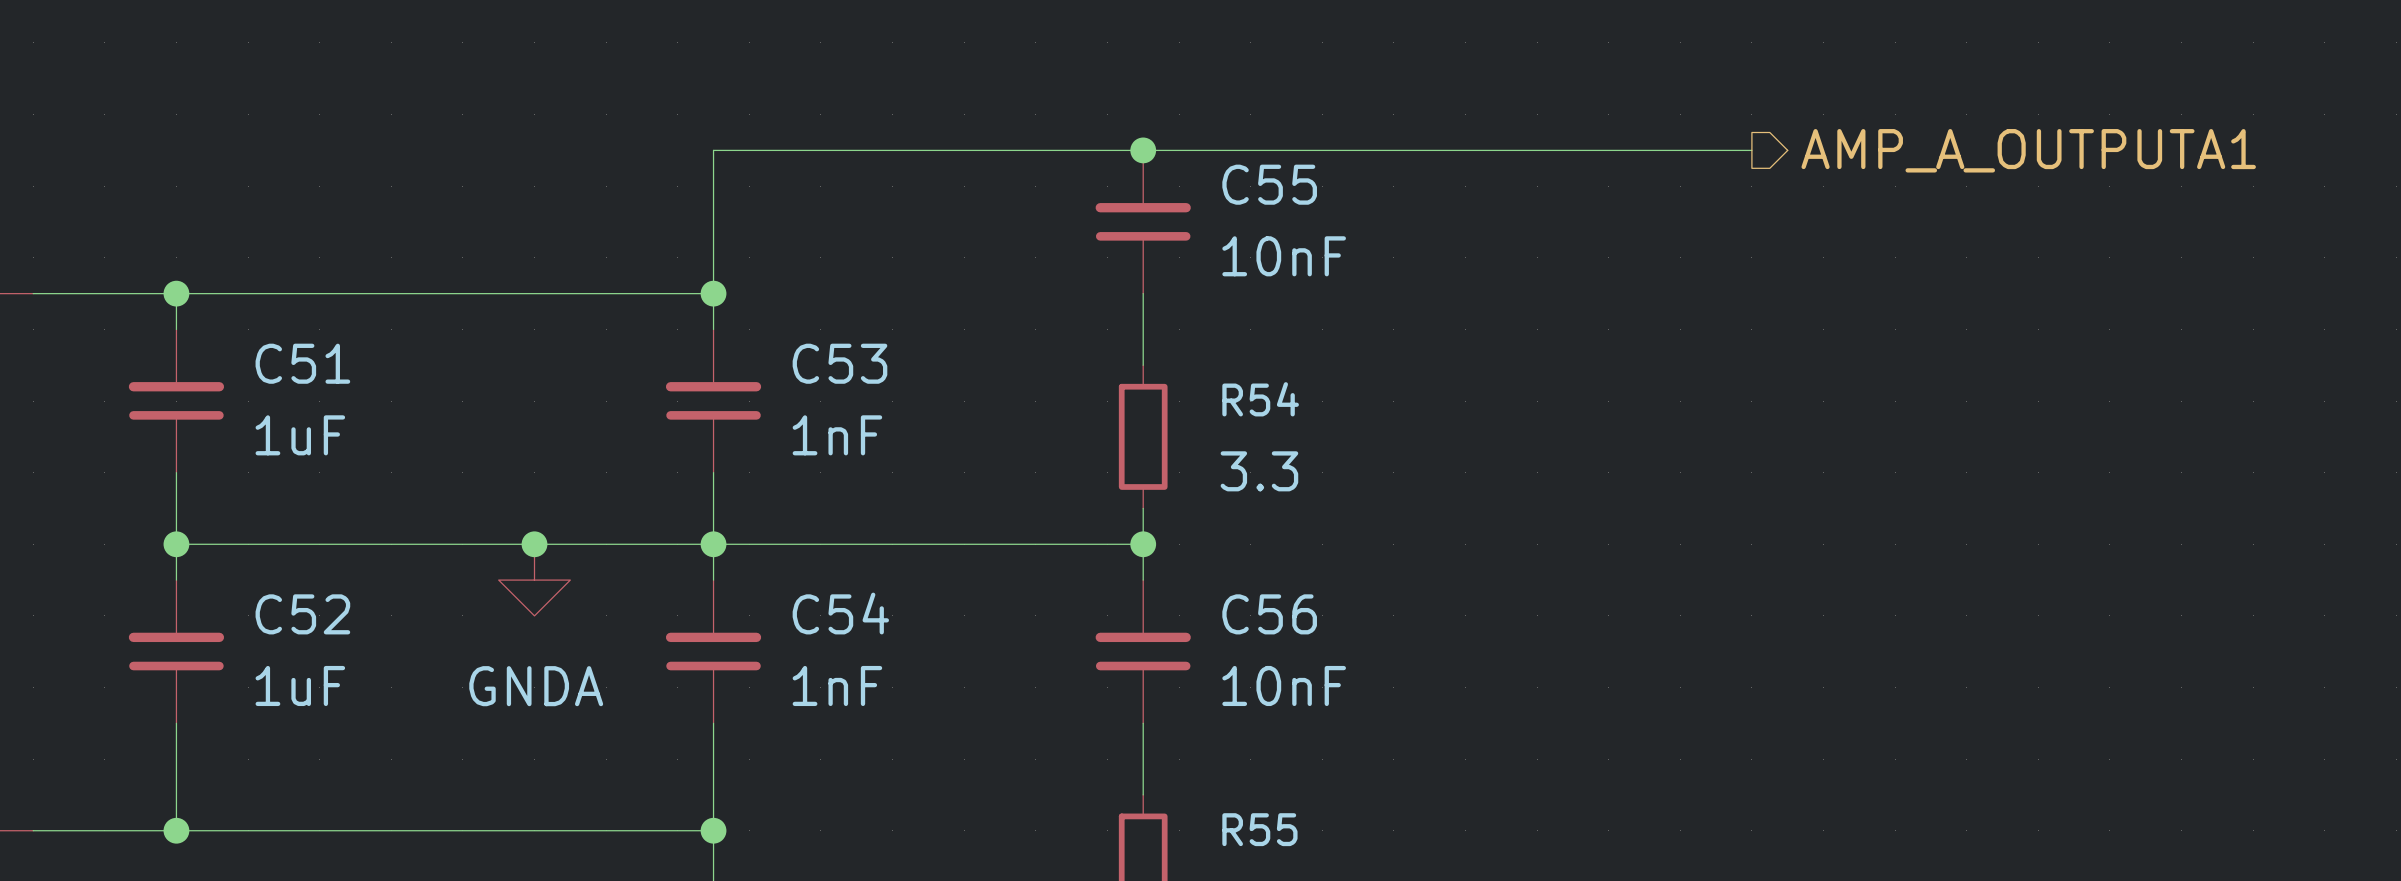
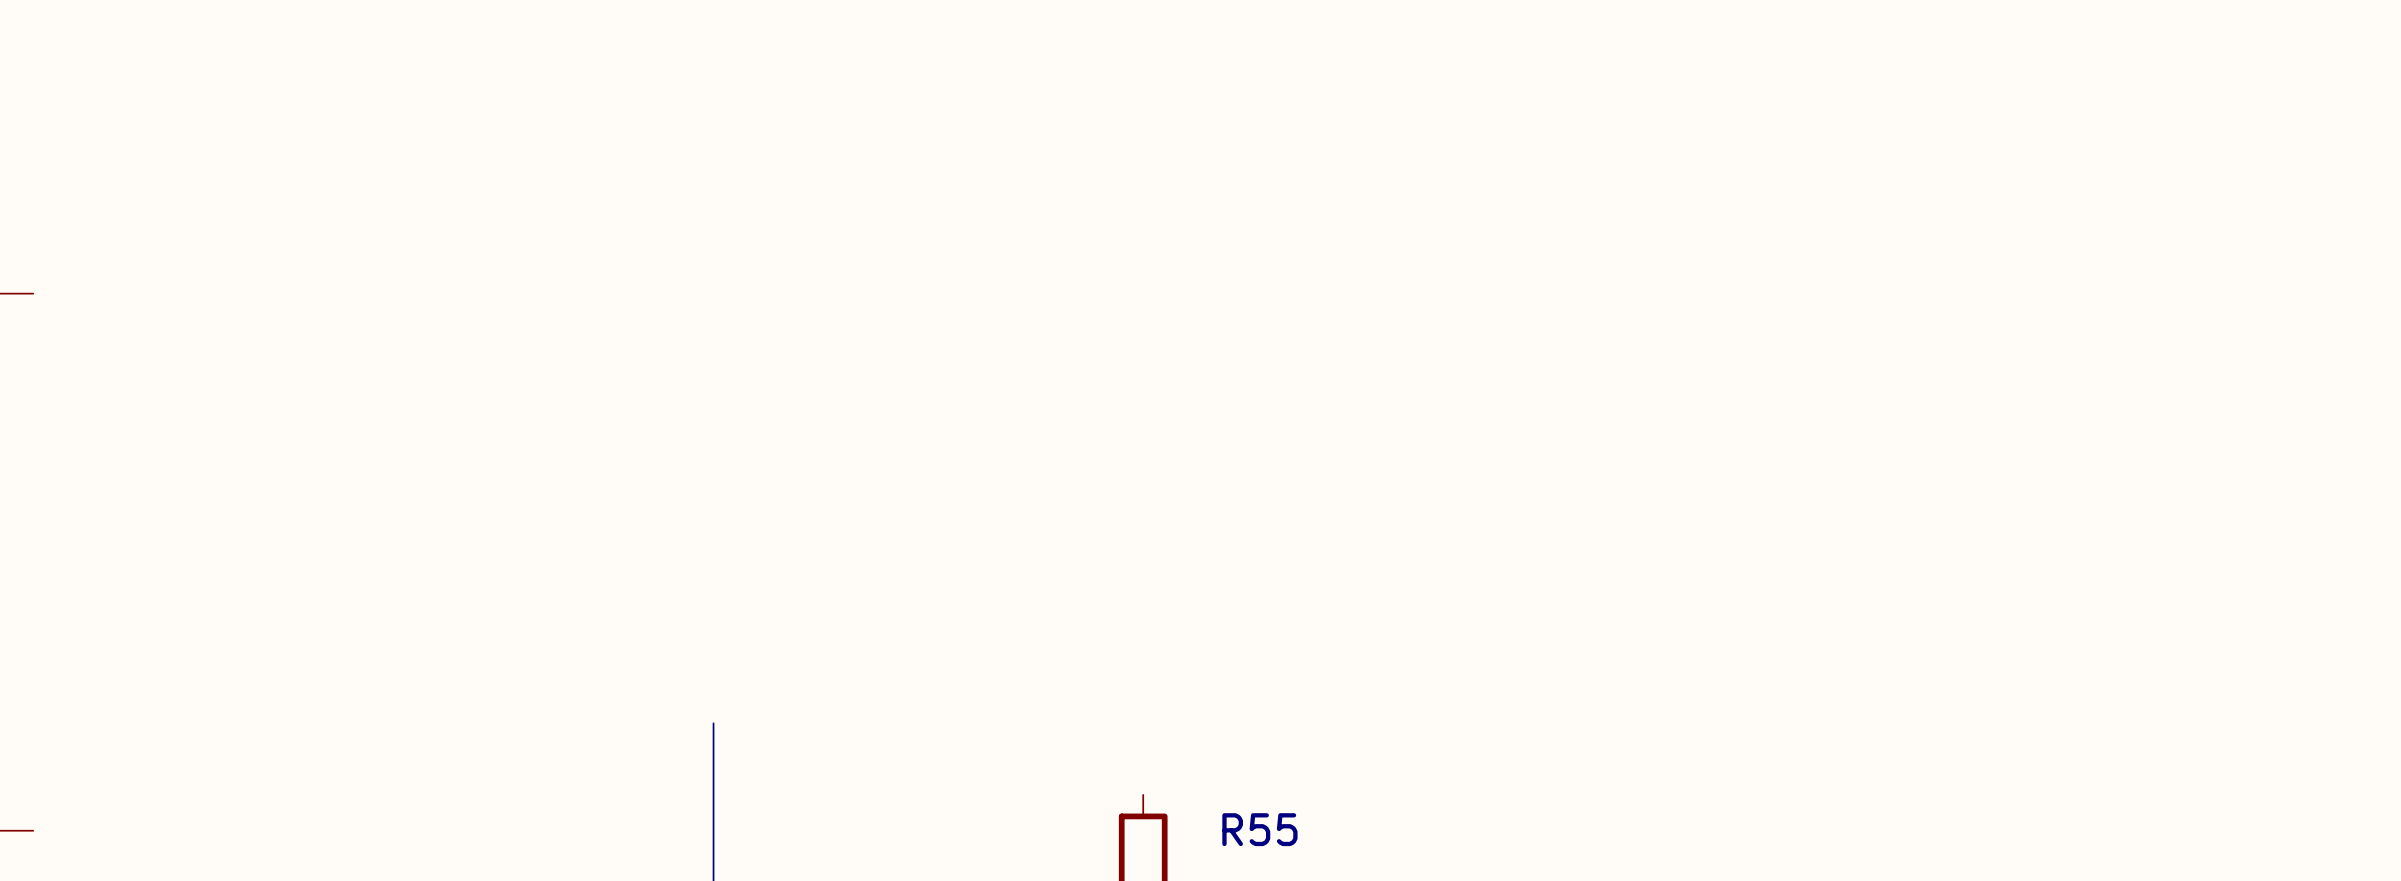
junction: (1143, 150) -> none
wire: (1751, 150) (713, 150) (713, 329) -> none
hierarchical label: AMP_A_OUTPUTA1 (2028, 150) -> none
C55: 10nF (1143, 222) -> none
wire: (33, 293) (713, 293) -> none
wire: (176, 293) (176, 329) -> none
junction: (176, 293) -> none
junction: (713, 293) -> none
wire: (1143, 293) (1143, 365) -> none
C51: 1uF (176, 401) -> none
C53: 1nF (713, 401) -> none
R54: 3.3 (1143, 436) -> none
wire: (176, 472) (176, 580) -> none
wire: (713, 472) (713, 580) -> none
wire: (1143, 508) (1143, 580) -> none
wire: (176, 544) (1143, 544) -> none
junction: (176, 544) -> none
junction: (534, 544) -> none
junction: (713, 544) -> none
junction: (1143, 544) -> none
power symbol: GNDA (534, 580) -> none
C52: 1uF (176, 651) -> none
C54: 1nF (713, 651) -> none
C56: 10nF (1143, 651) -> none
wire: (176, 723) (176, 830) -> none
wire: (1143, 723) (1143, 794) -> none
wire: (33, 830) (713, 830) -> none
junction: (176, 830) -> none
junction: (713, 830) -> none

